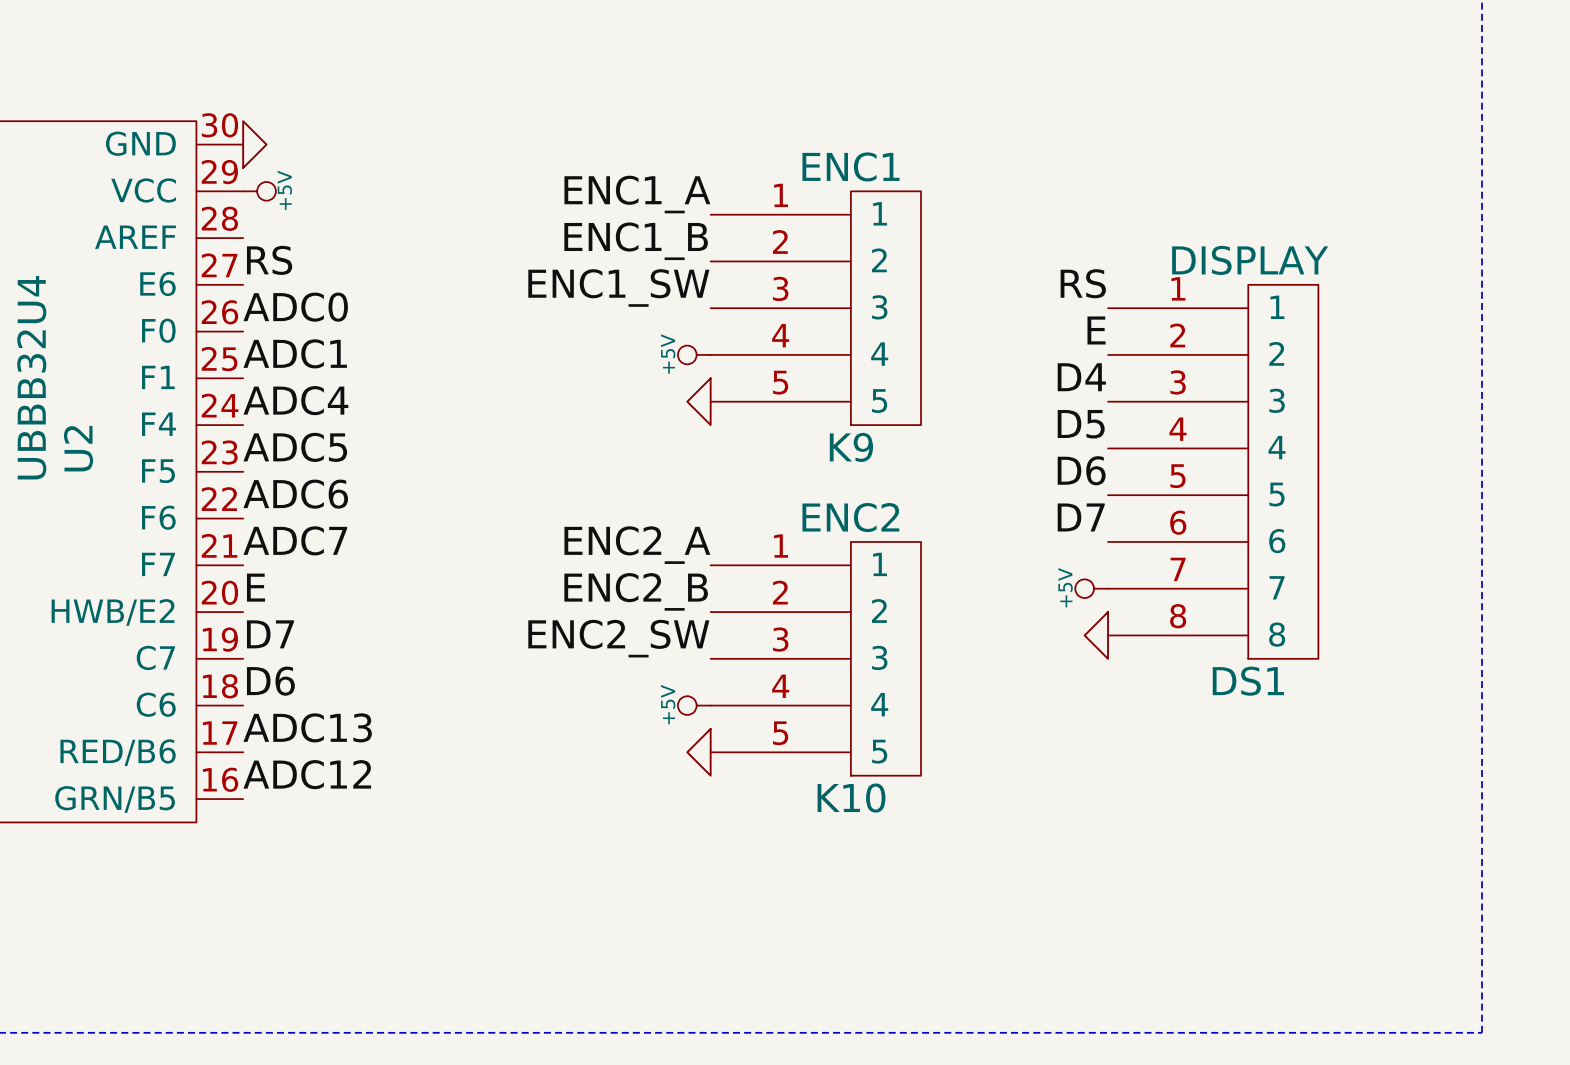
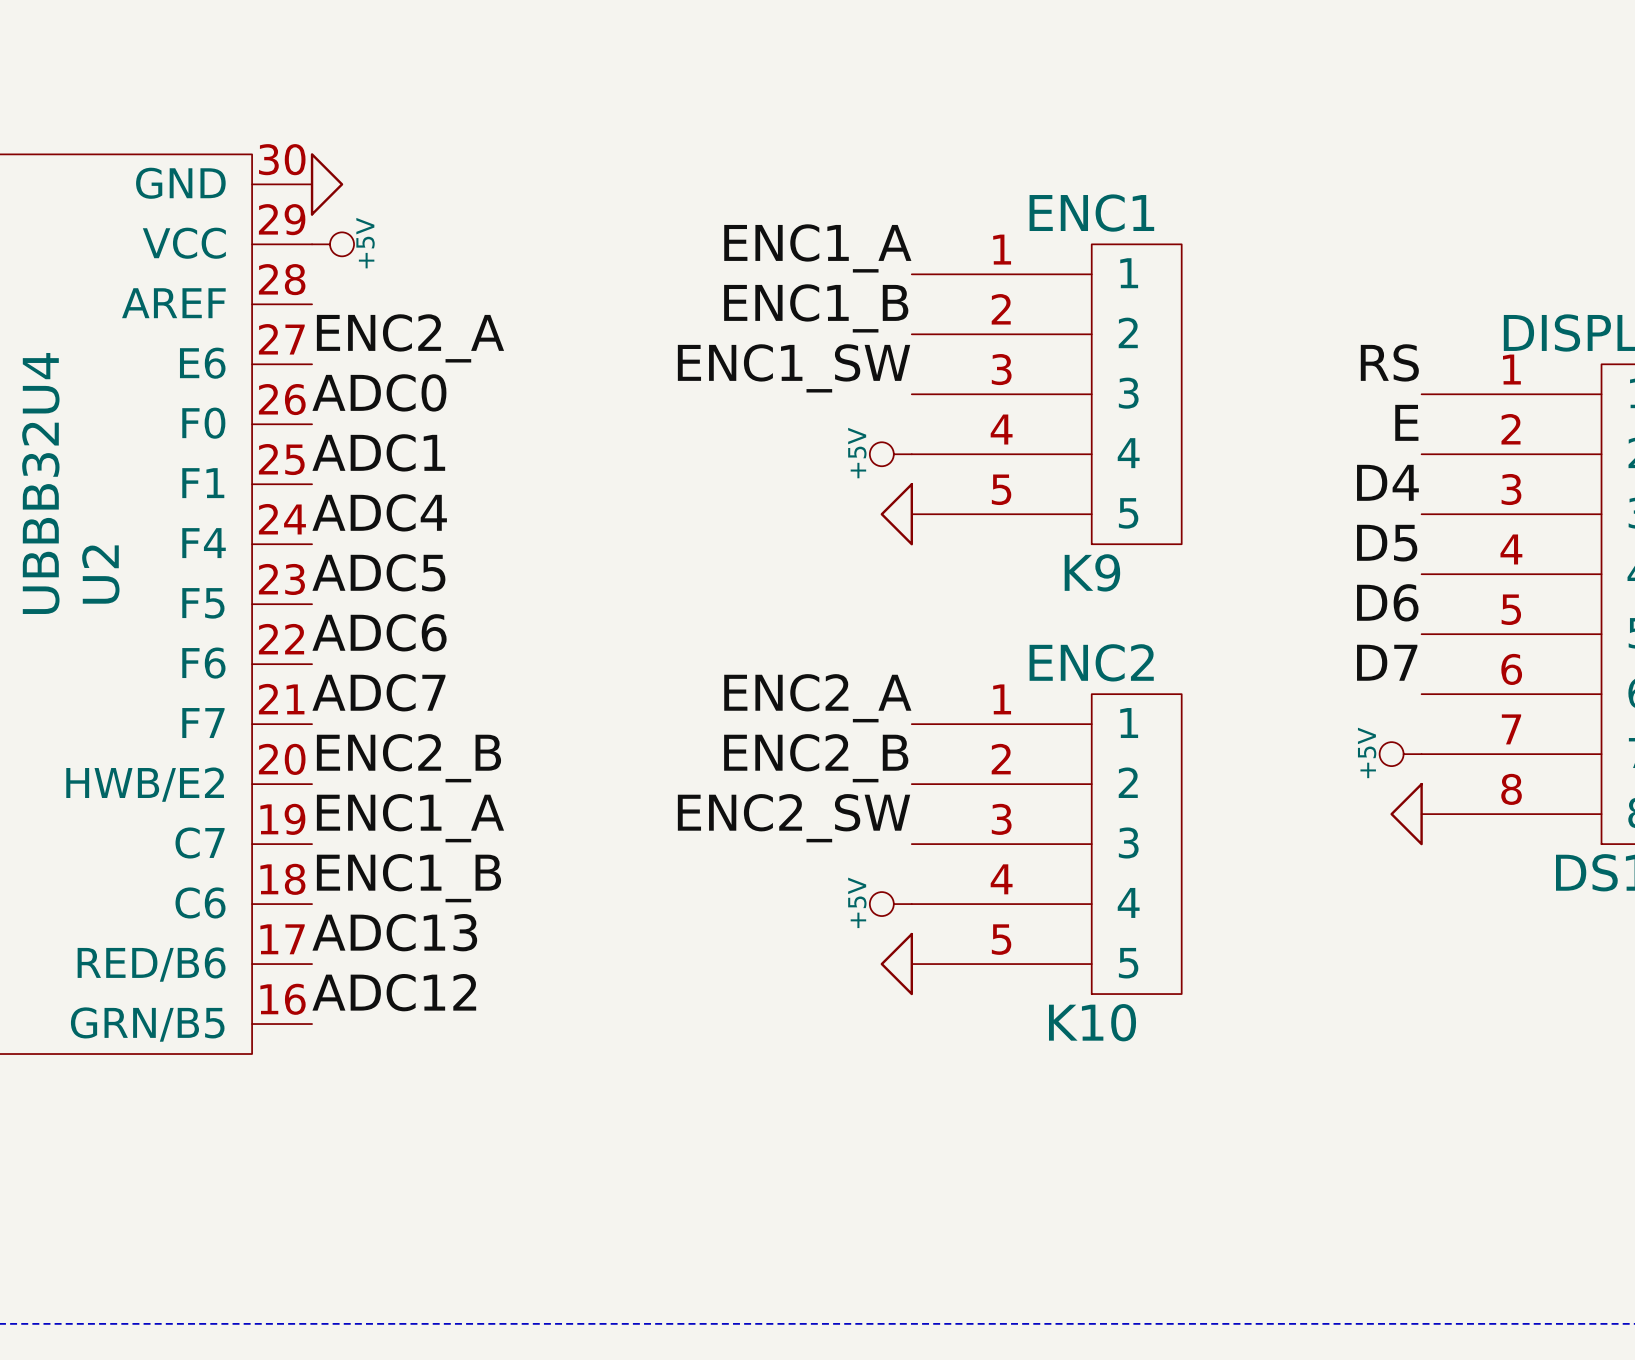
label: RS (269, 260) -> ENC2_A (410, 338)
label: E (255, 587) -> ENC2_B (408, 758)
label: D7 (270, 634) -> ENC1_A (410, 818)
label: D6 (270, 681) -> ENC1_B (408, 878)

